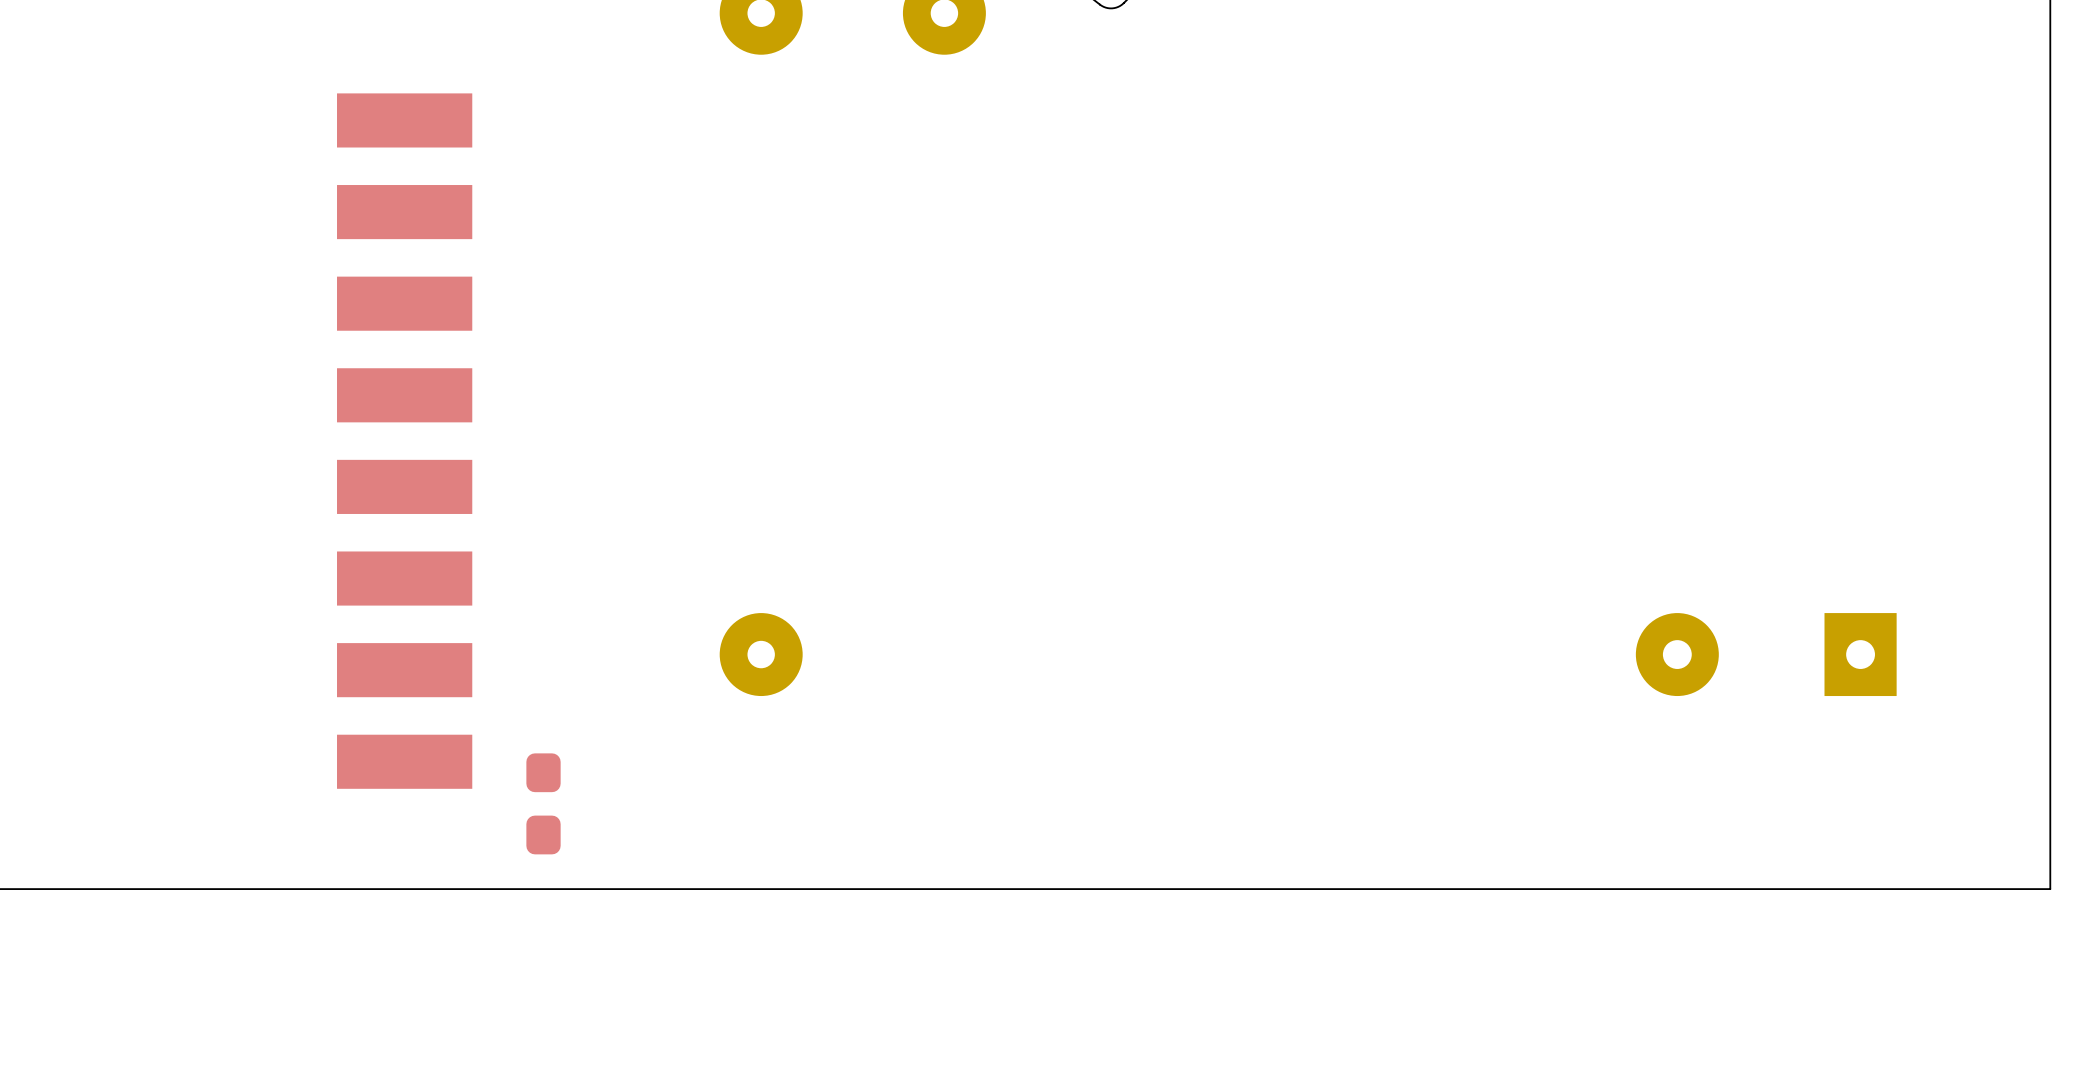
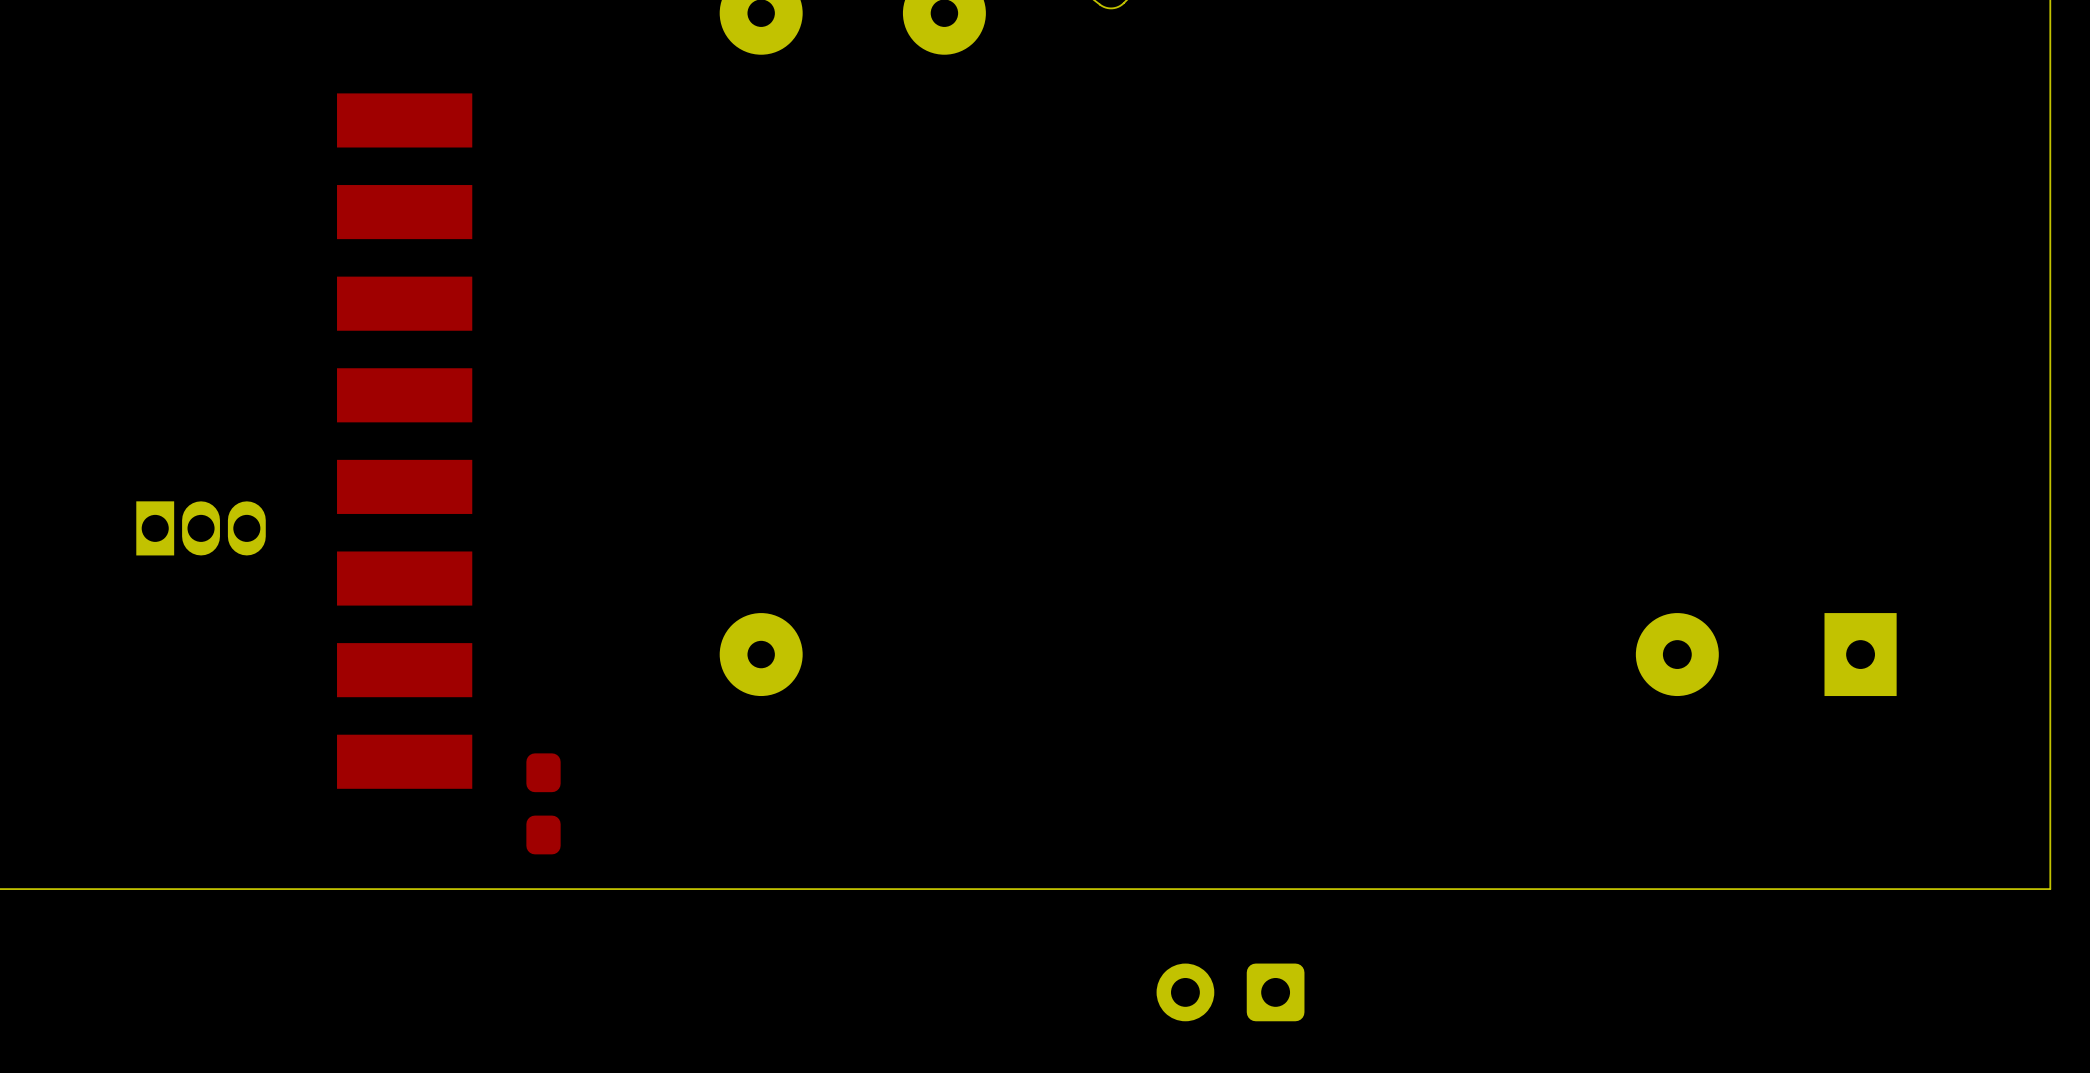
part: none -> (201, 528)
part: none -> (1230, 992)

